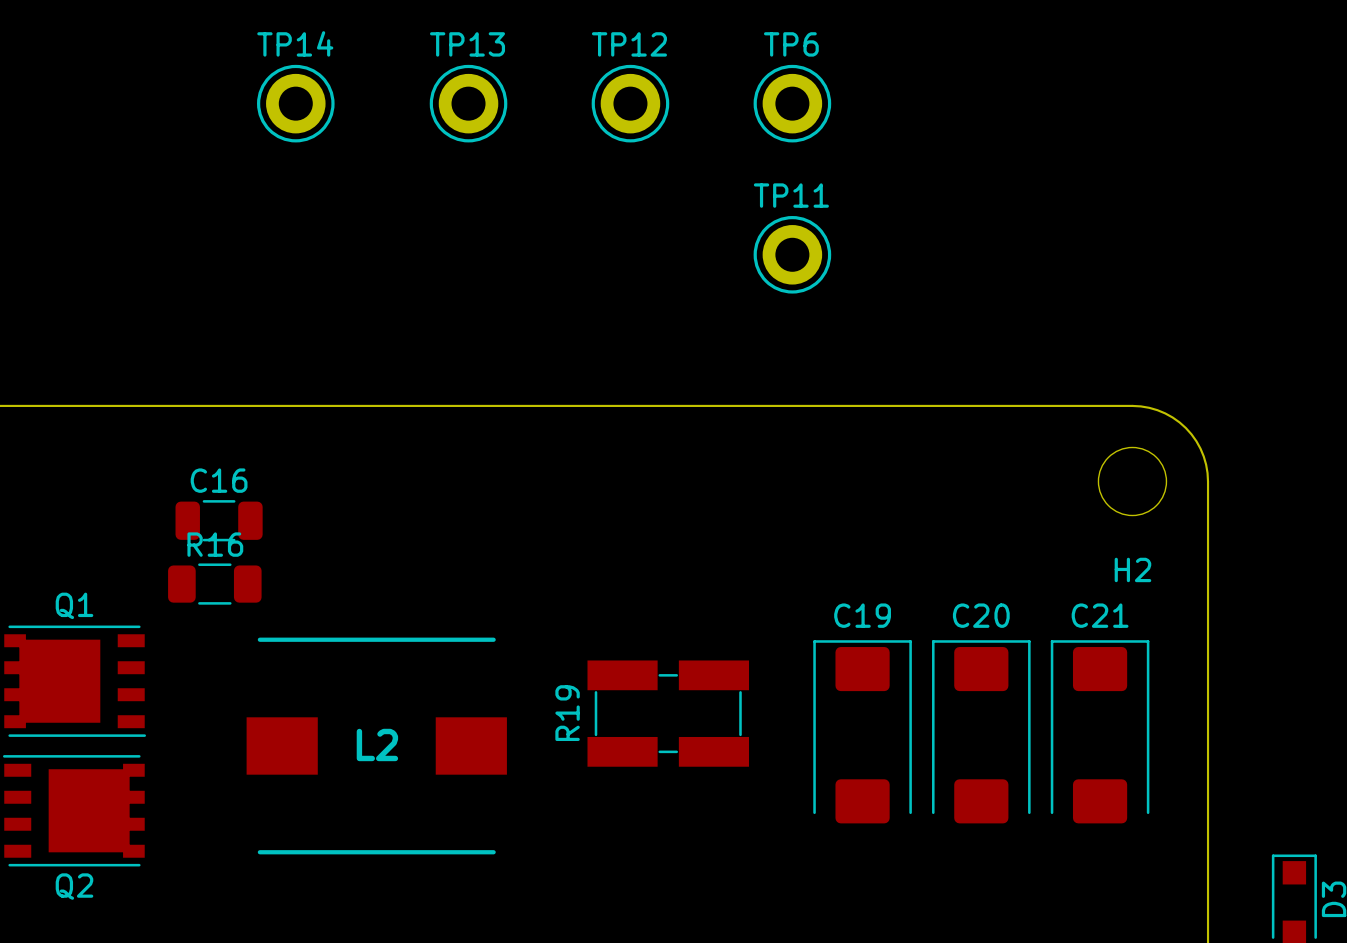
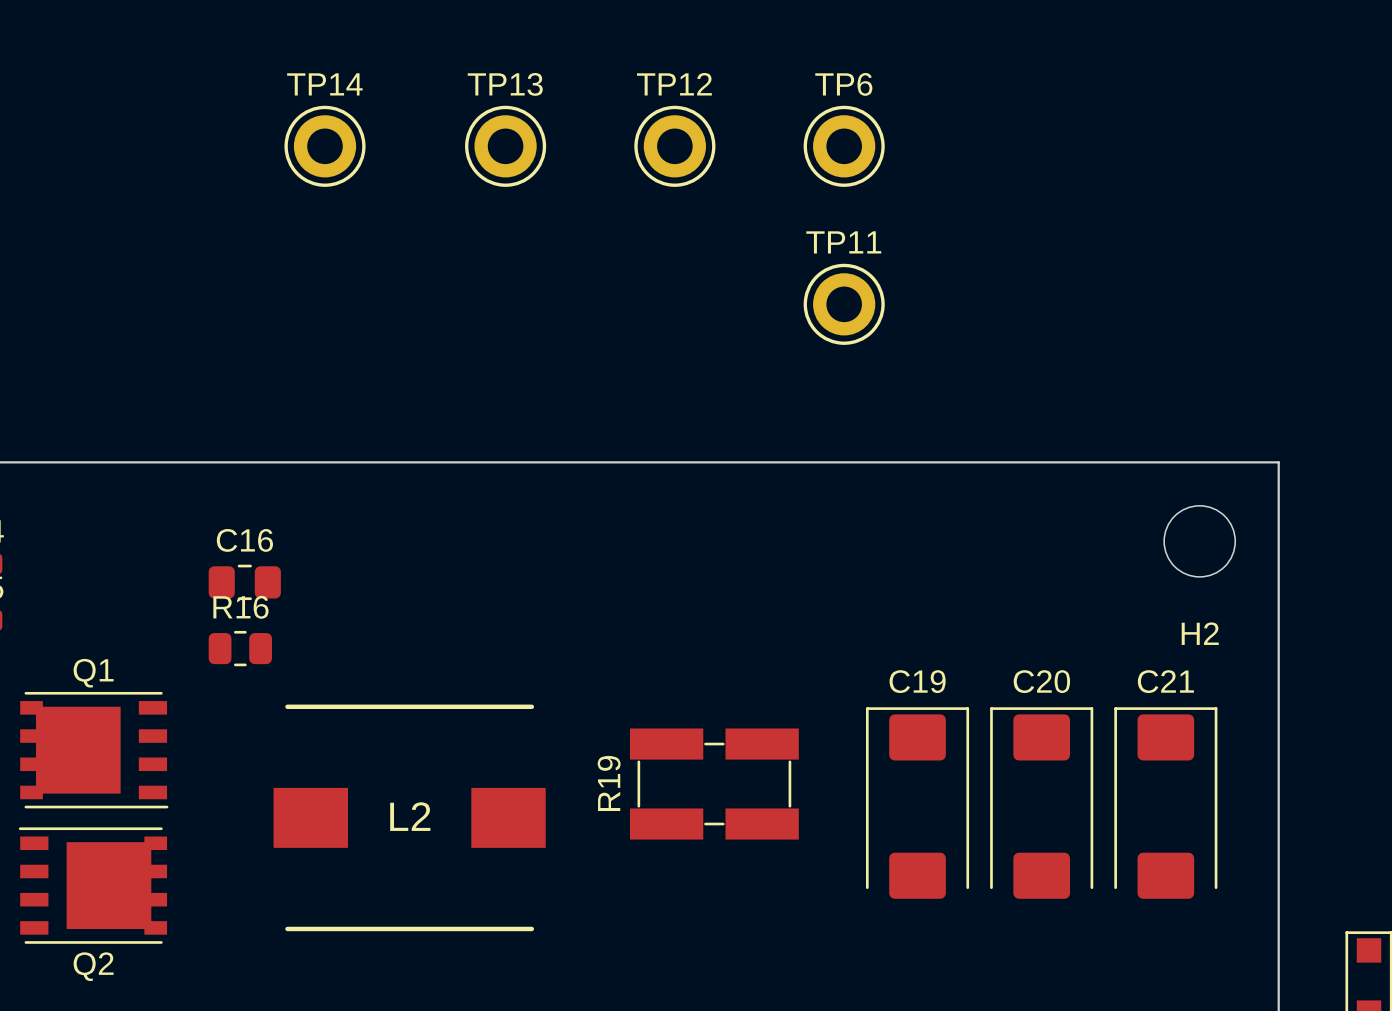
board edge: (1132, 405) (1149, 407) (1165, 413) (1185, 428) (1200, 448) (1206, 464) (1208, 481) -> (1199, 462) (1278, 462) (1278, 541)
C16 footprint: [175, 500, 263, 542] -> [208, 564, 281, 601]
R16 footprint: [168, 563, 262, 605] -> [208, 630, 273, 667]

